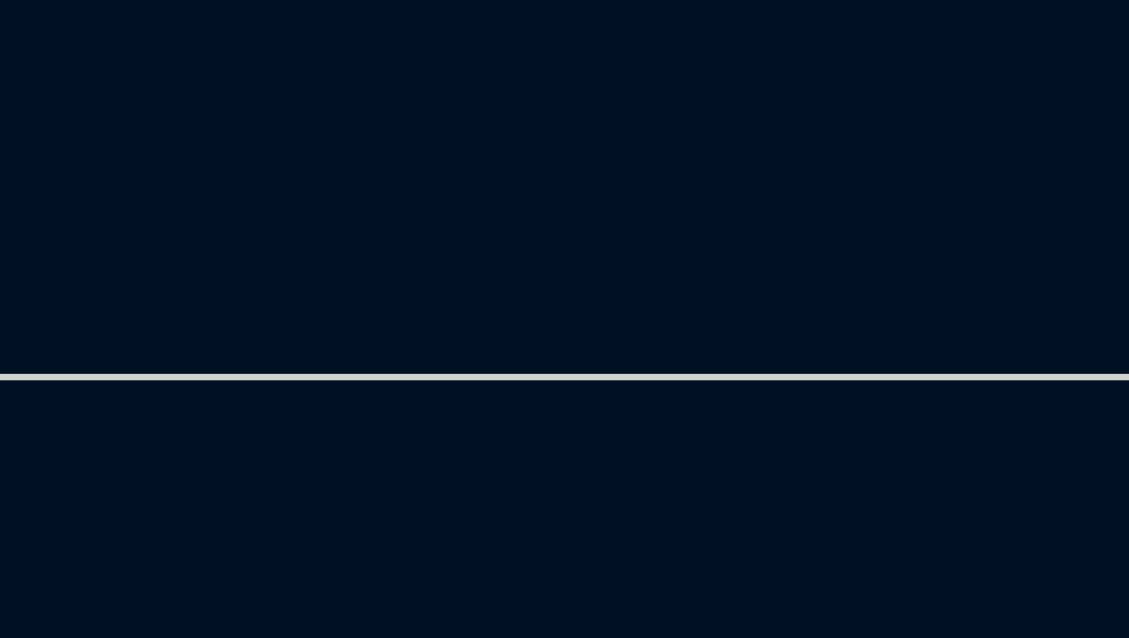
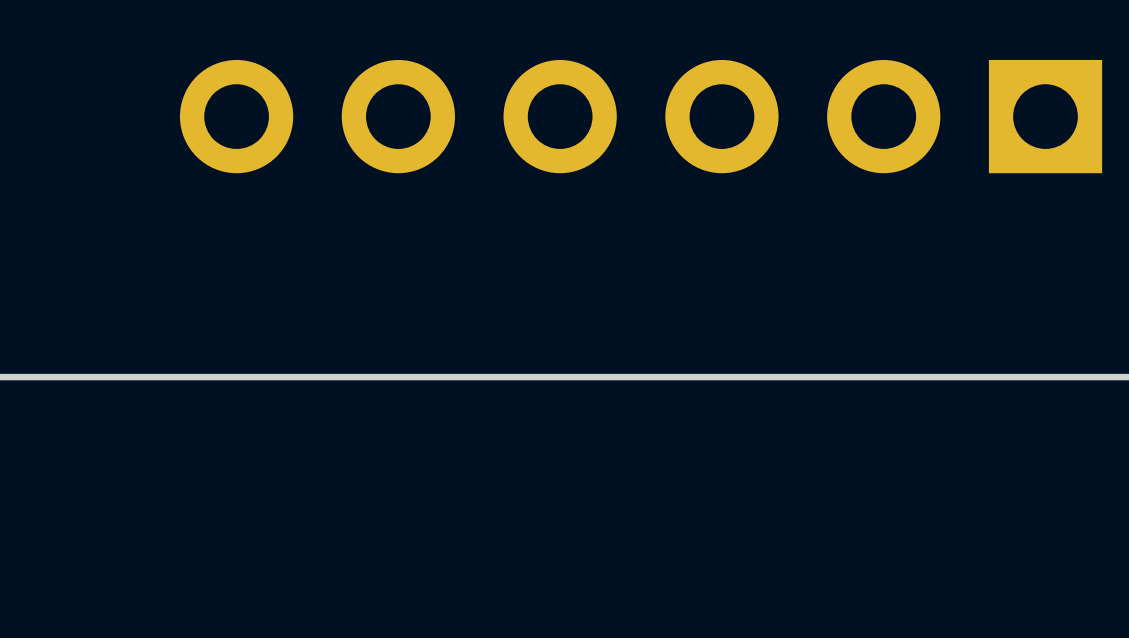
part: none -> (641, 116)

